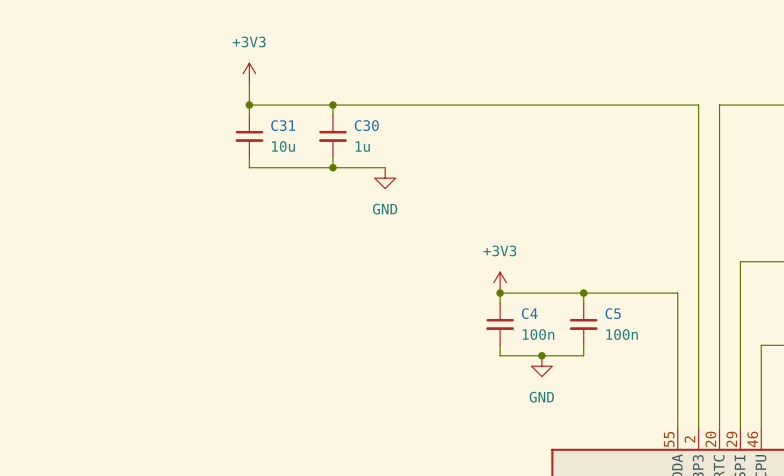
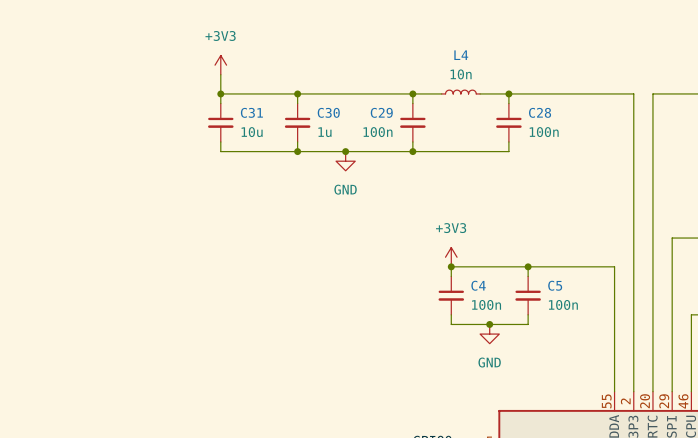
L4: none -> 10n (460, 92)
wire: none -> (412, 93) (412, 103)
junction: none -> (412, 93)
wire: (489, 105) (531, 105) -> none
wire: none -> (508, 93) (508, 103)
junction: none -> (508, 93)
C29: none -> 100n (412, 122)
C28: none -> 100n (508, 122)
wire: none -> (412, 141) (412, 151)
wire: none -> (508, 141) (508, 151) (345, 151)
junction: none -> (345, 151)
junction: none -> (412, 151)

